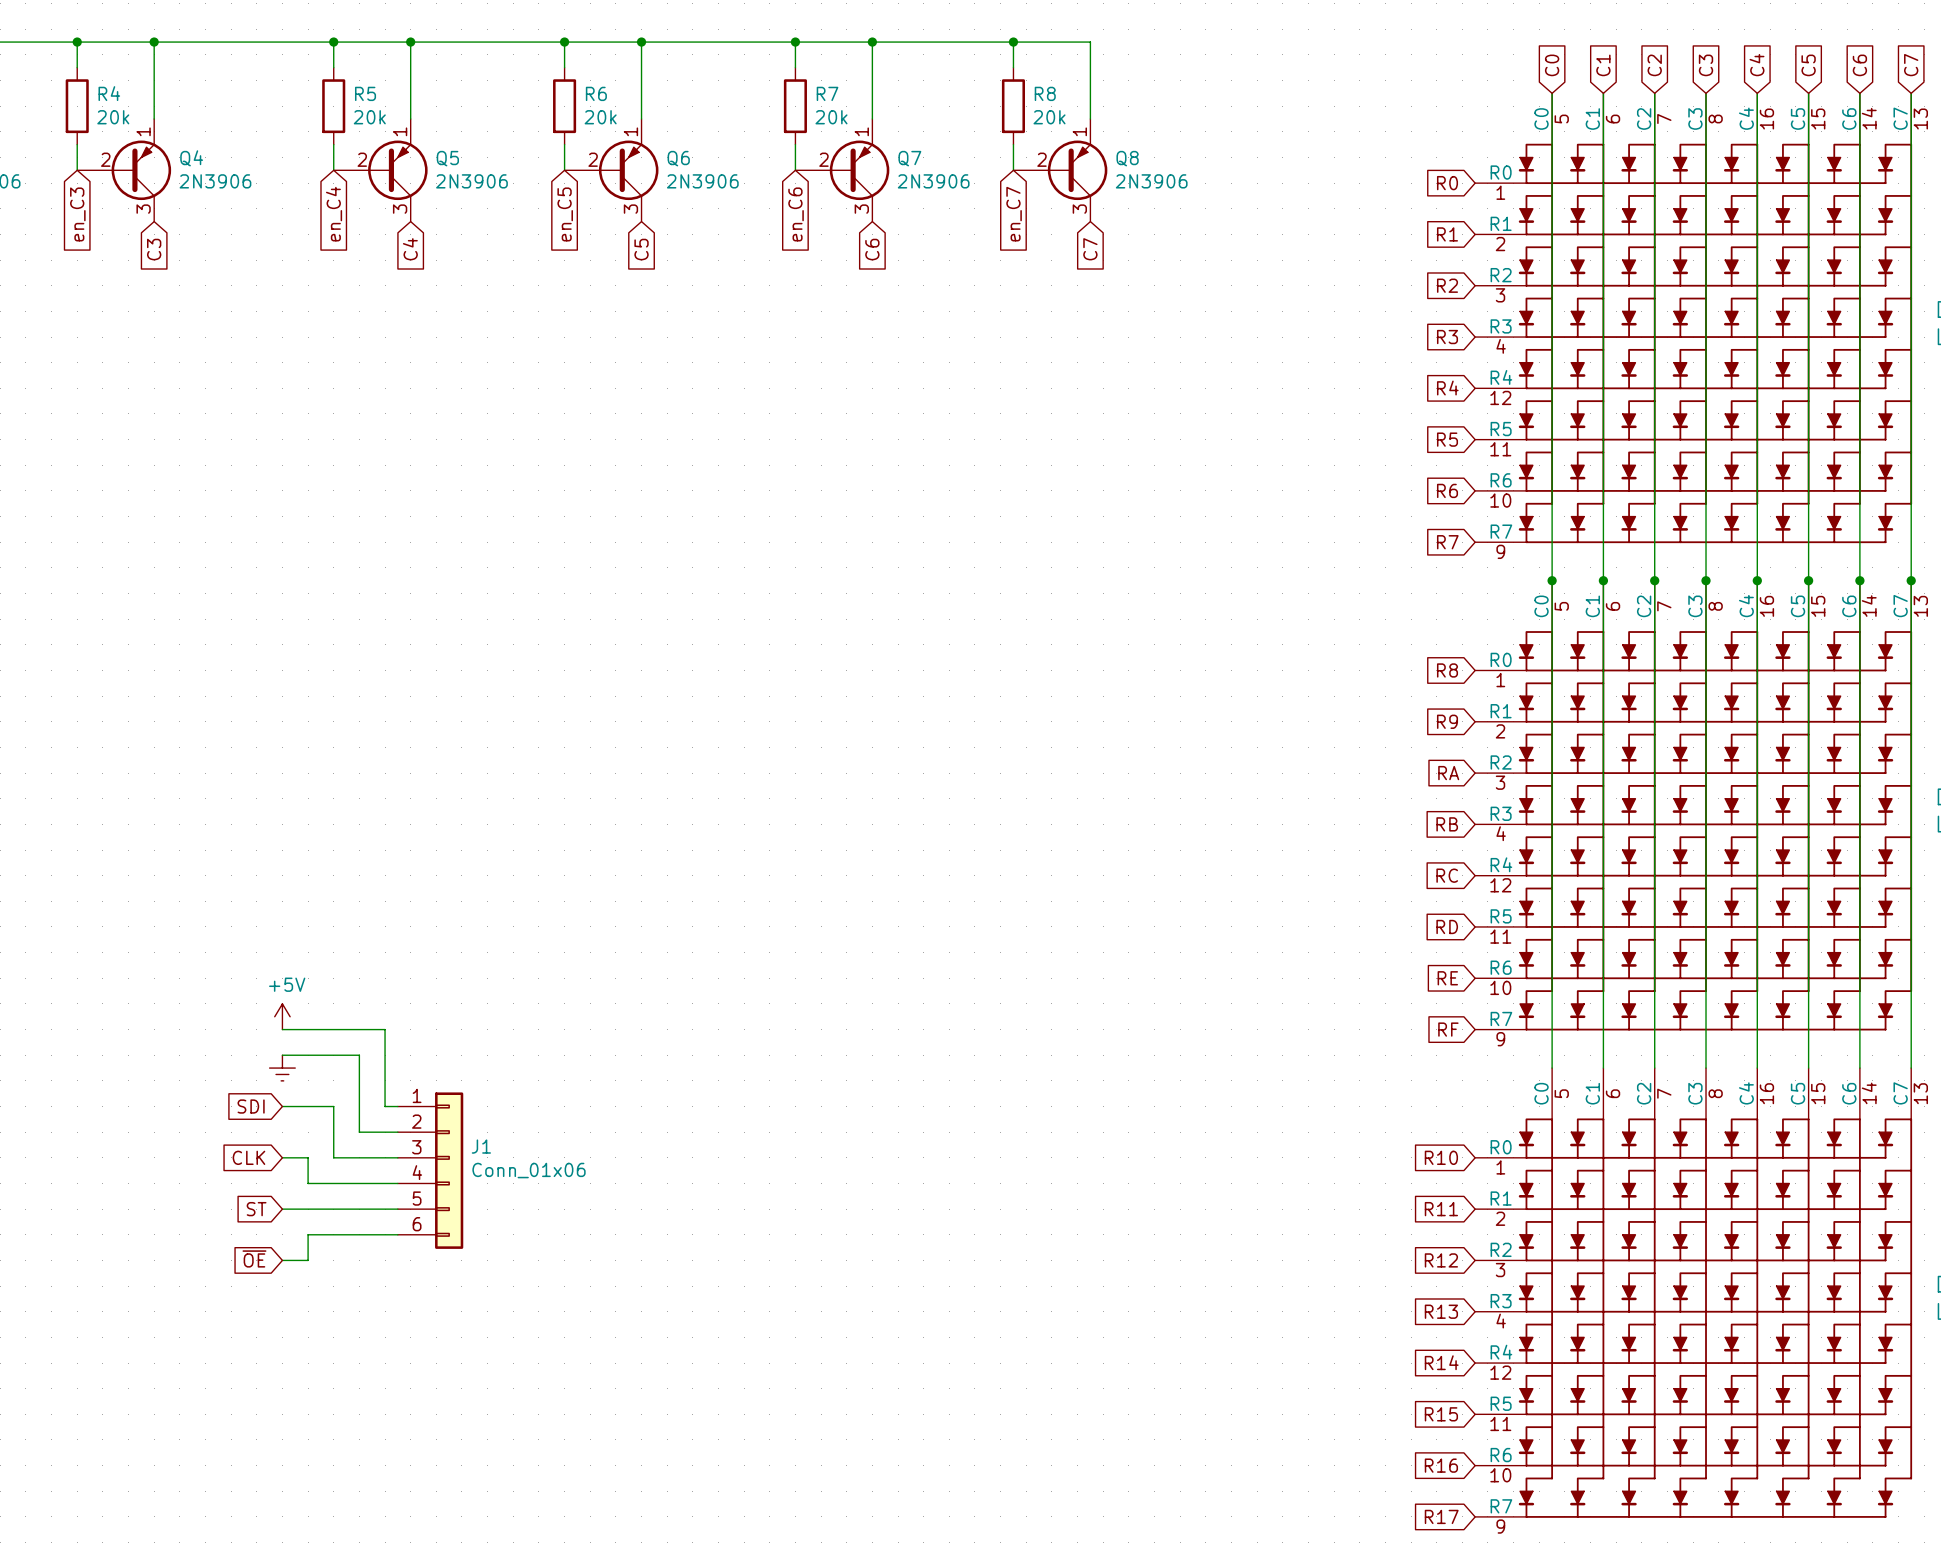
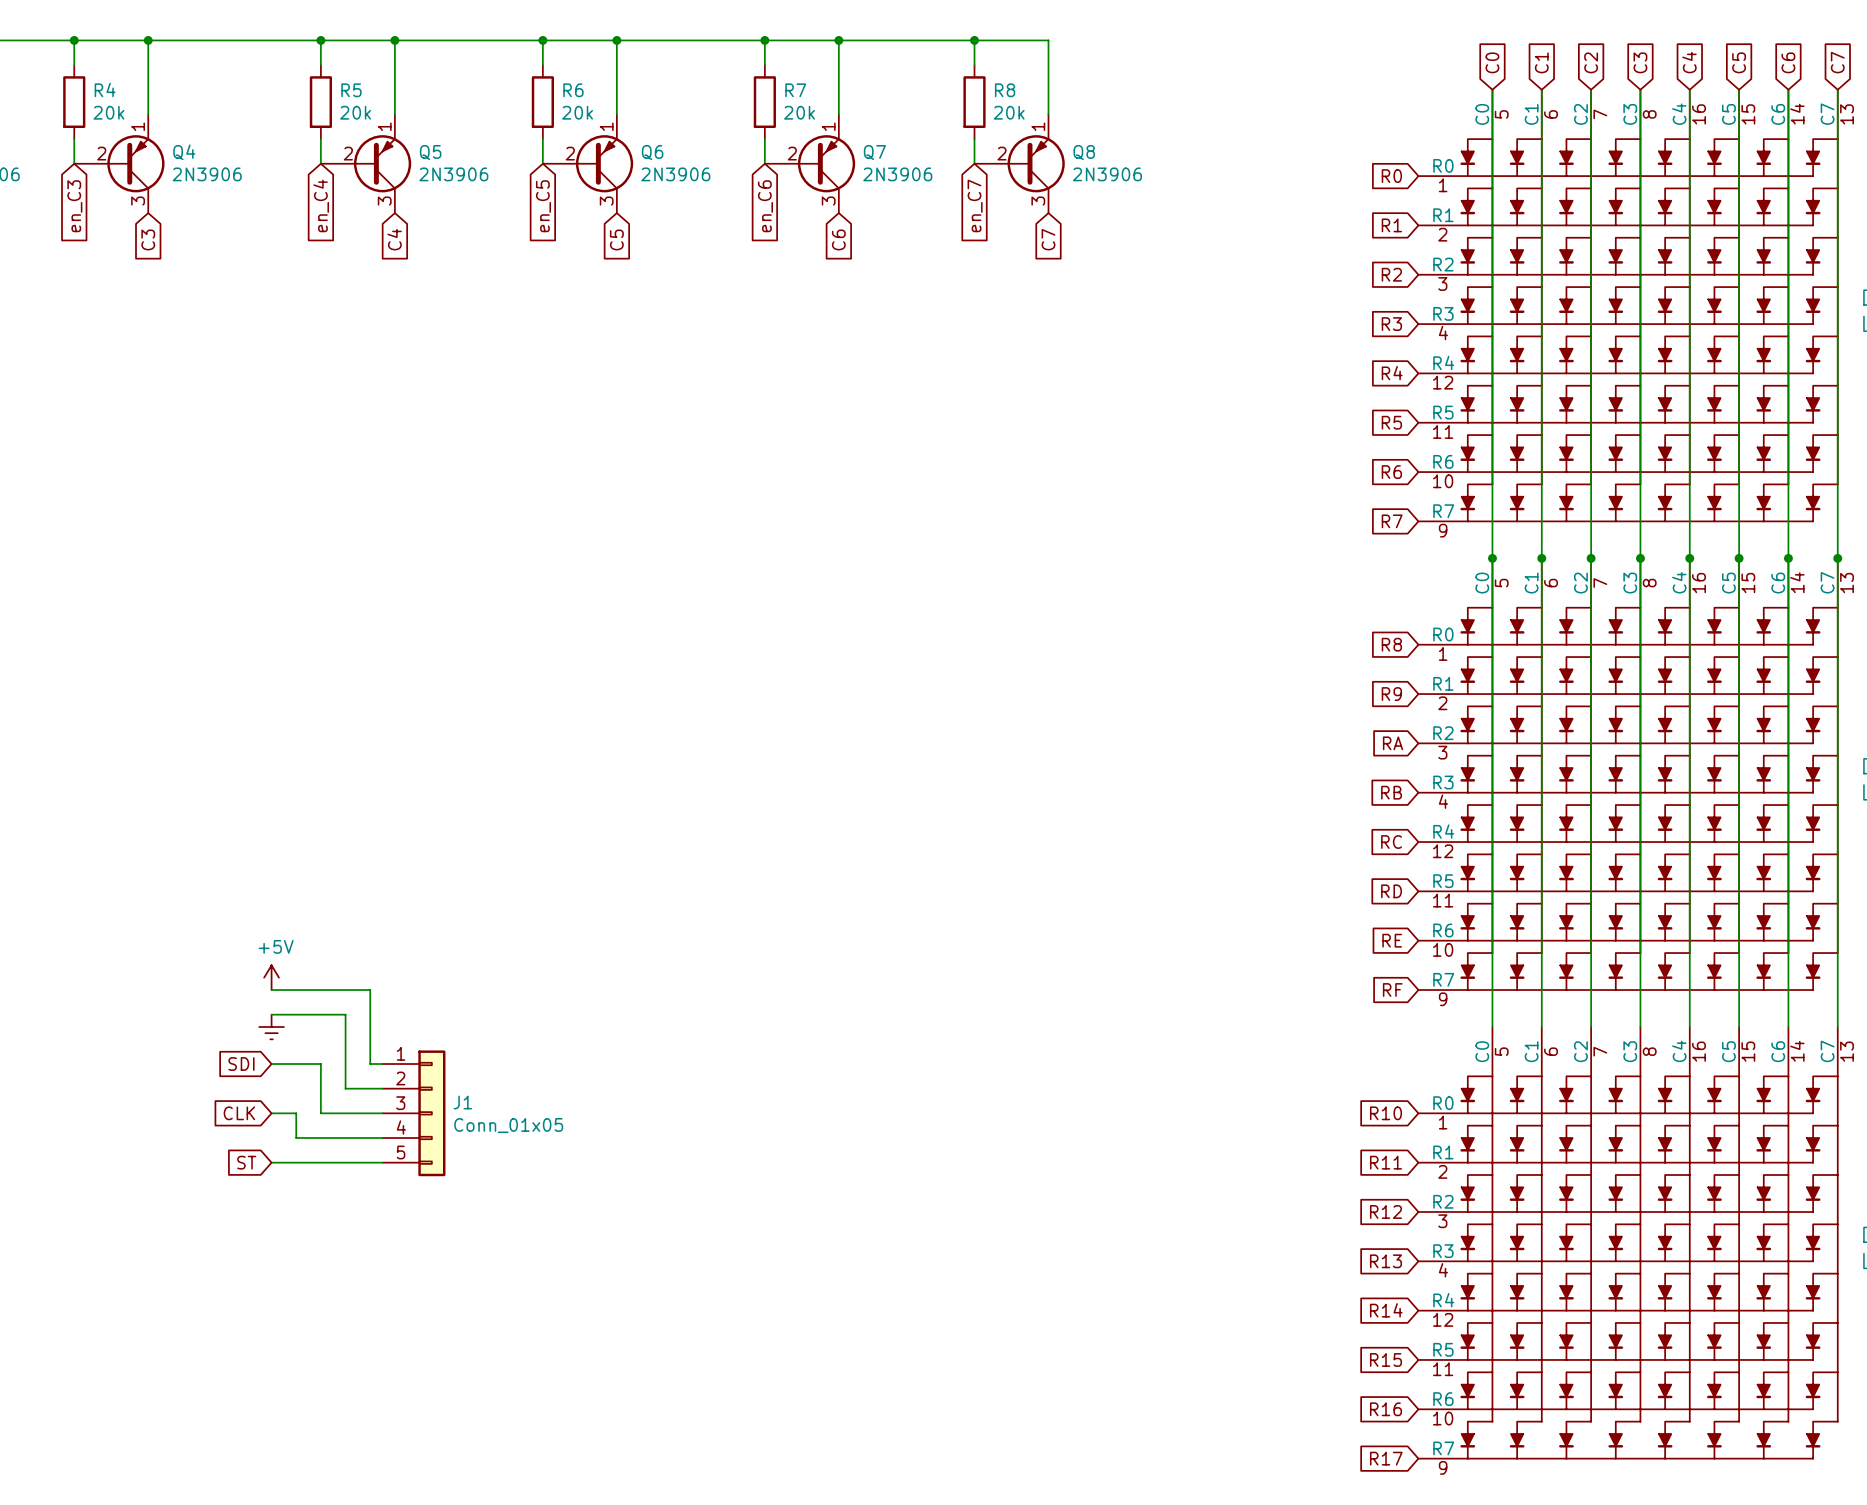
J1 symbol: [397, 1092, 464, 1249] -> [382, 1050, 446, 1177]
J1 value: Conn_01x06 (529, 1170) -> Conn_01x05 (508, 1125)
wire: (397, 1234) (308, 1234) (308, 1260) (282, 1260) -> none
global label: ~{OE} (254, 1258) -> none

